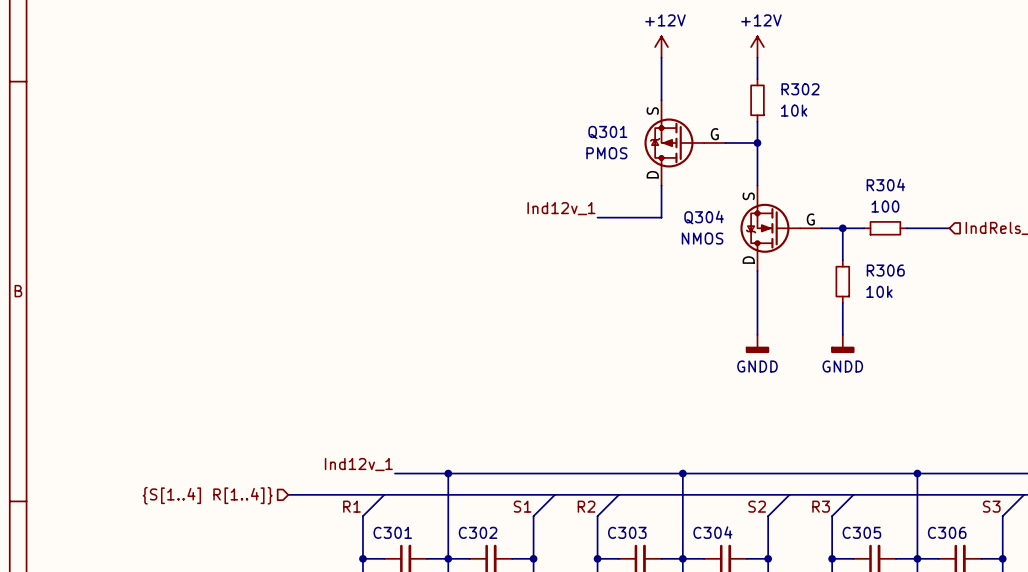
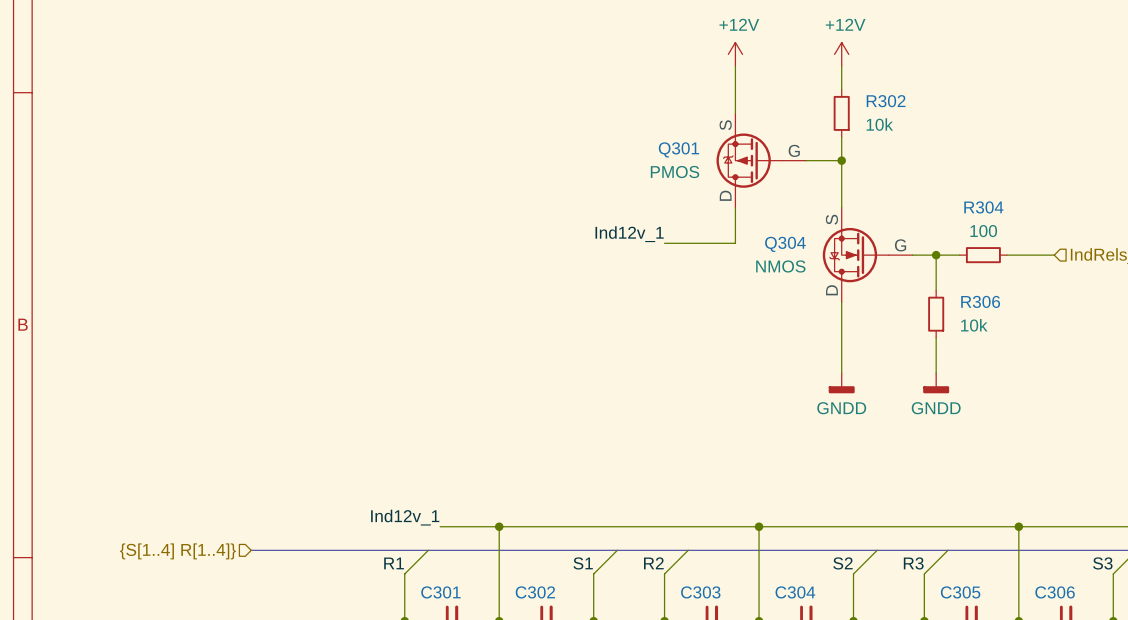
bus: none -> (251, 550) (322, 550)
hierarchical label position: {S[1..4] R[1..4]} (207, 495) -> {S[1..4] R[1..4]} (177, 551)

